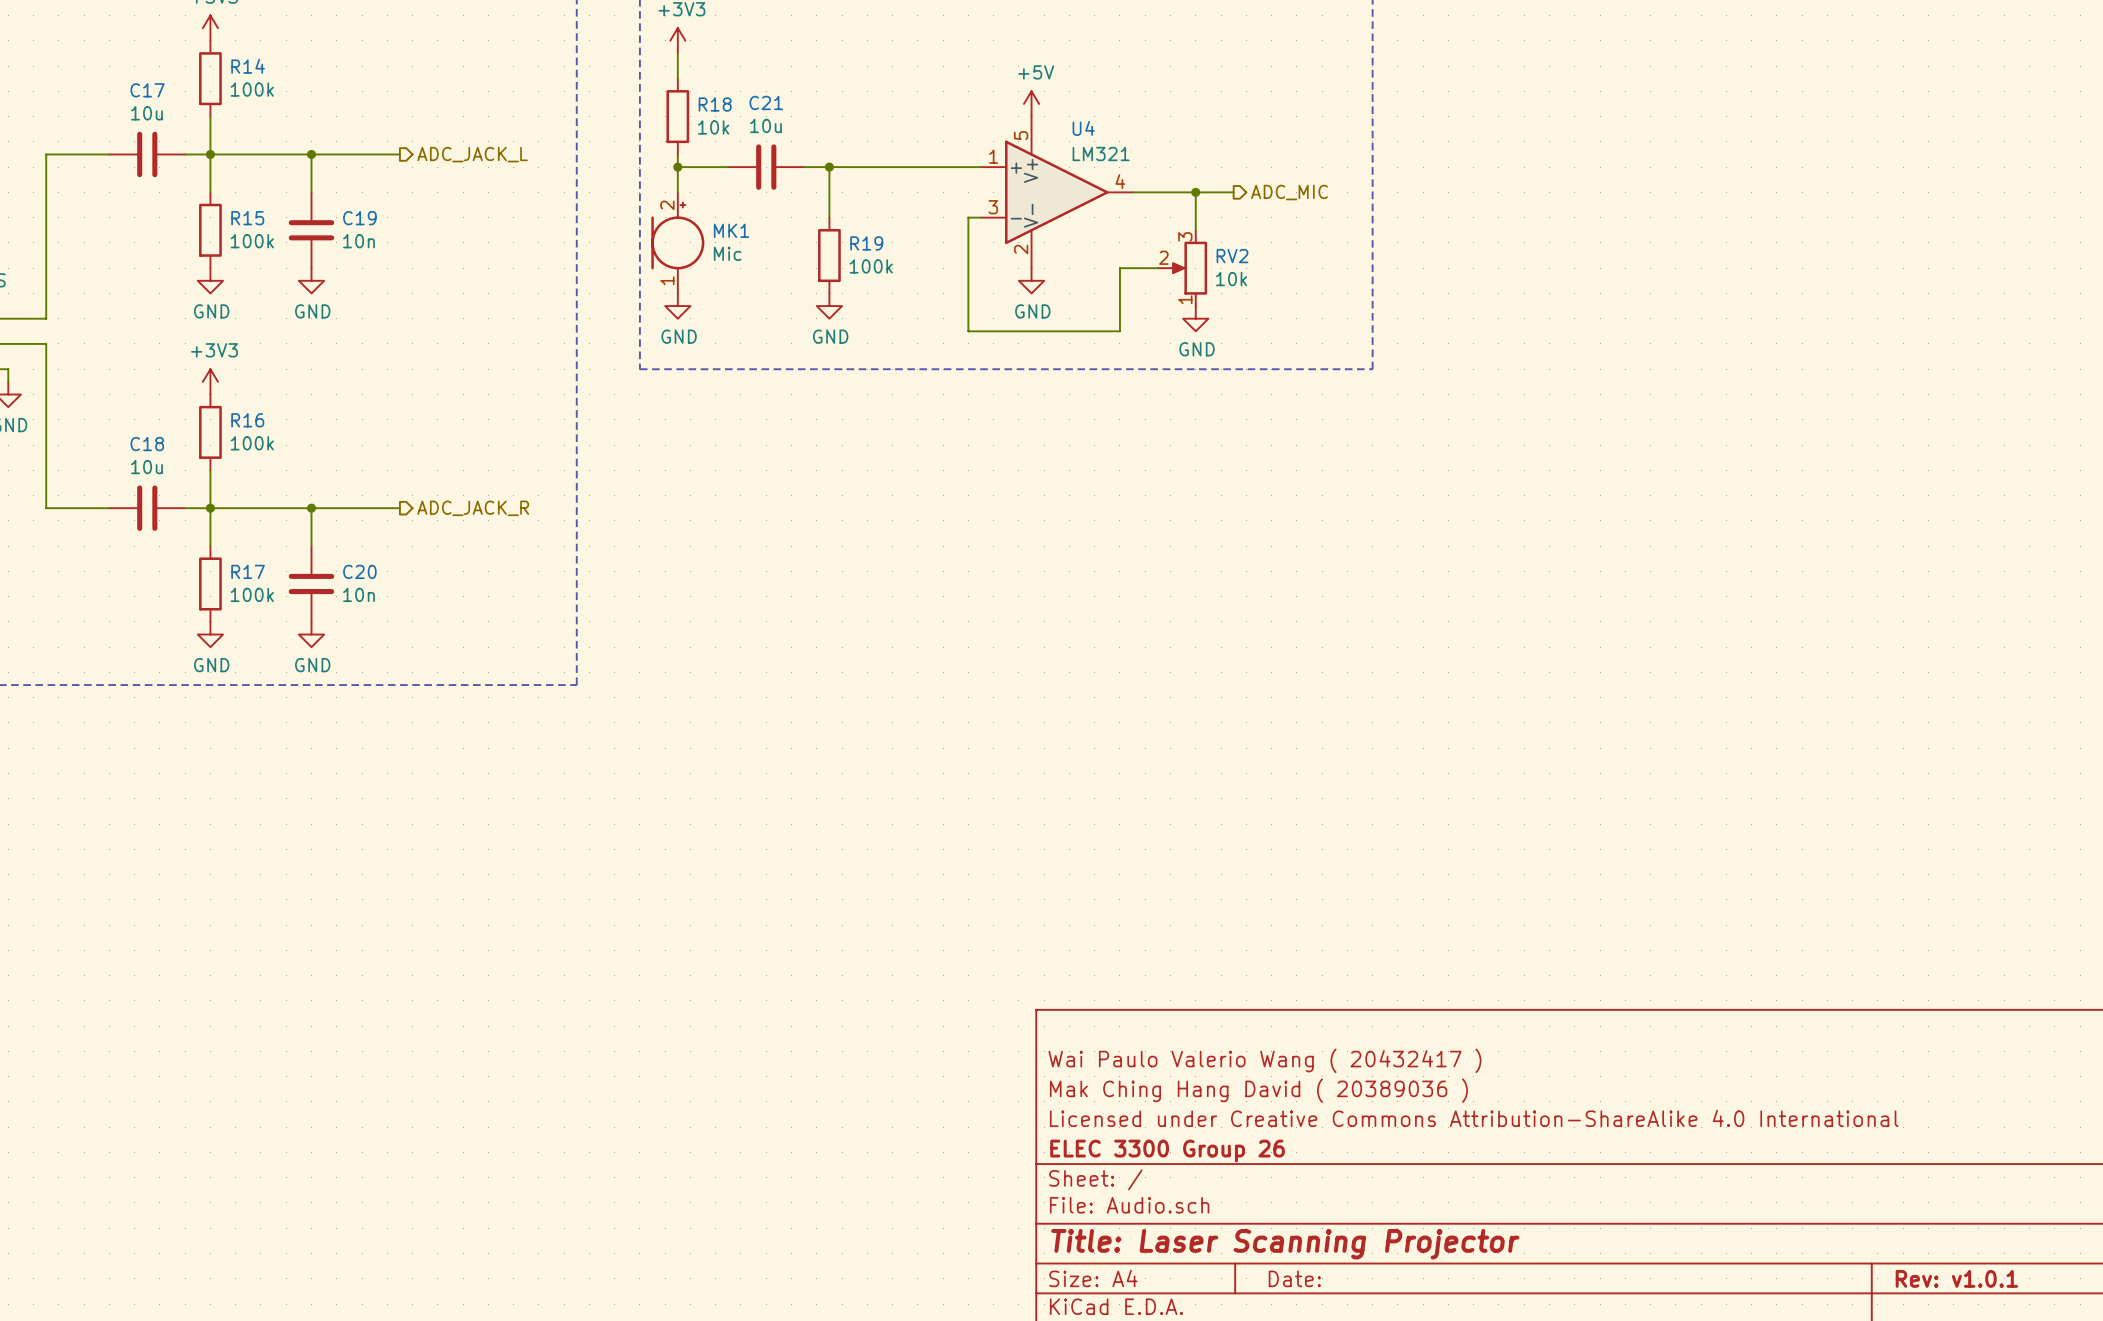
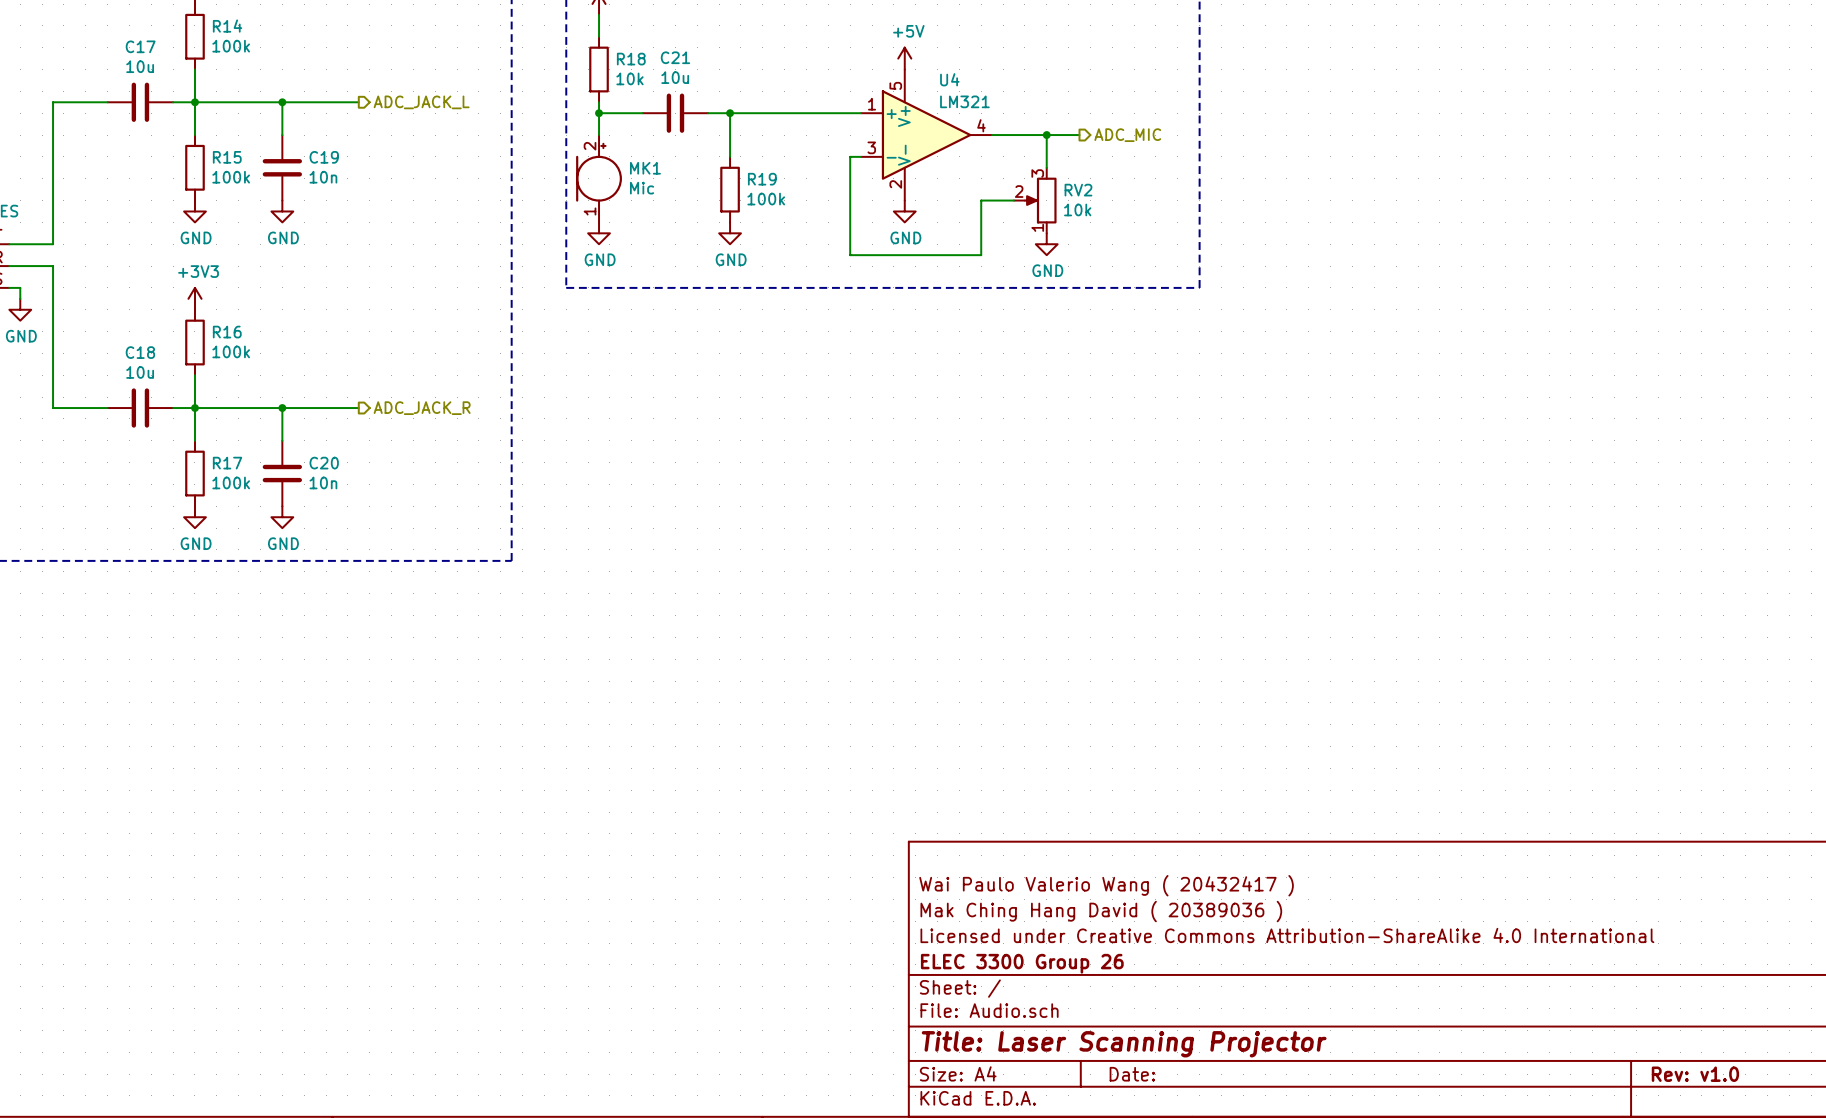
title block: Rev: v1.0.1 (1956, 1278) -> Rev: v1.0 (1695, 1074)

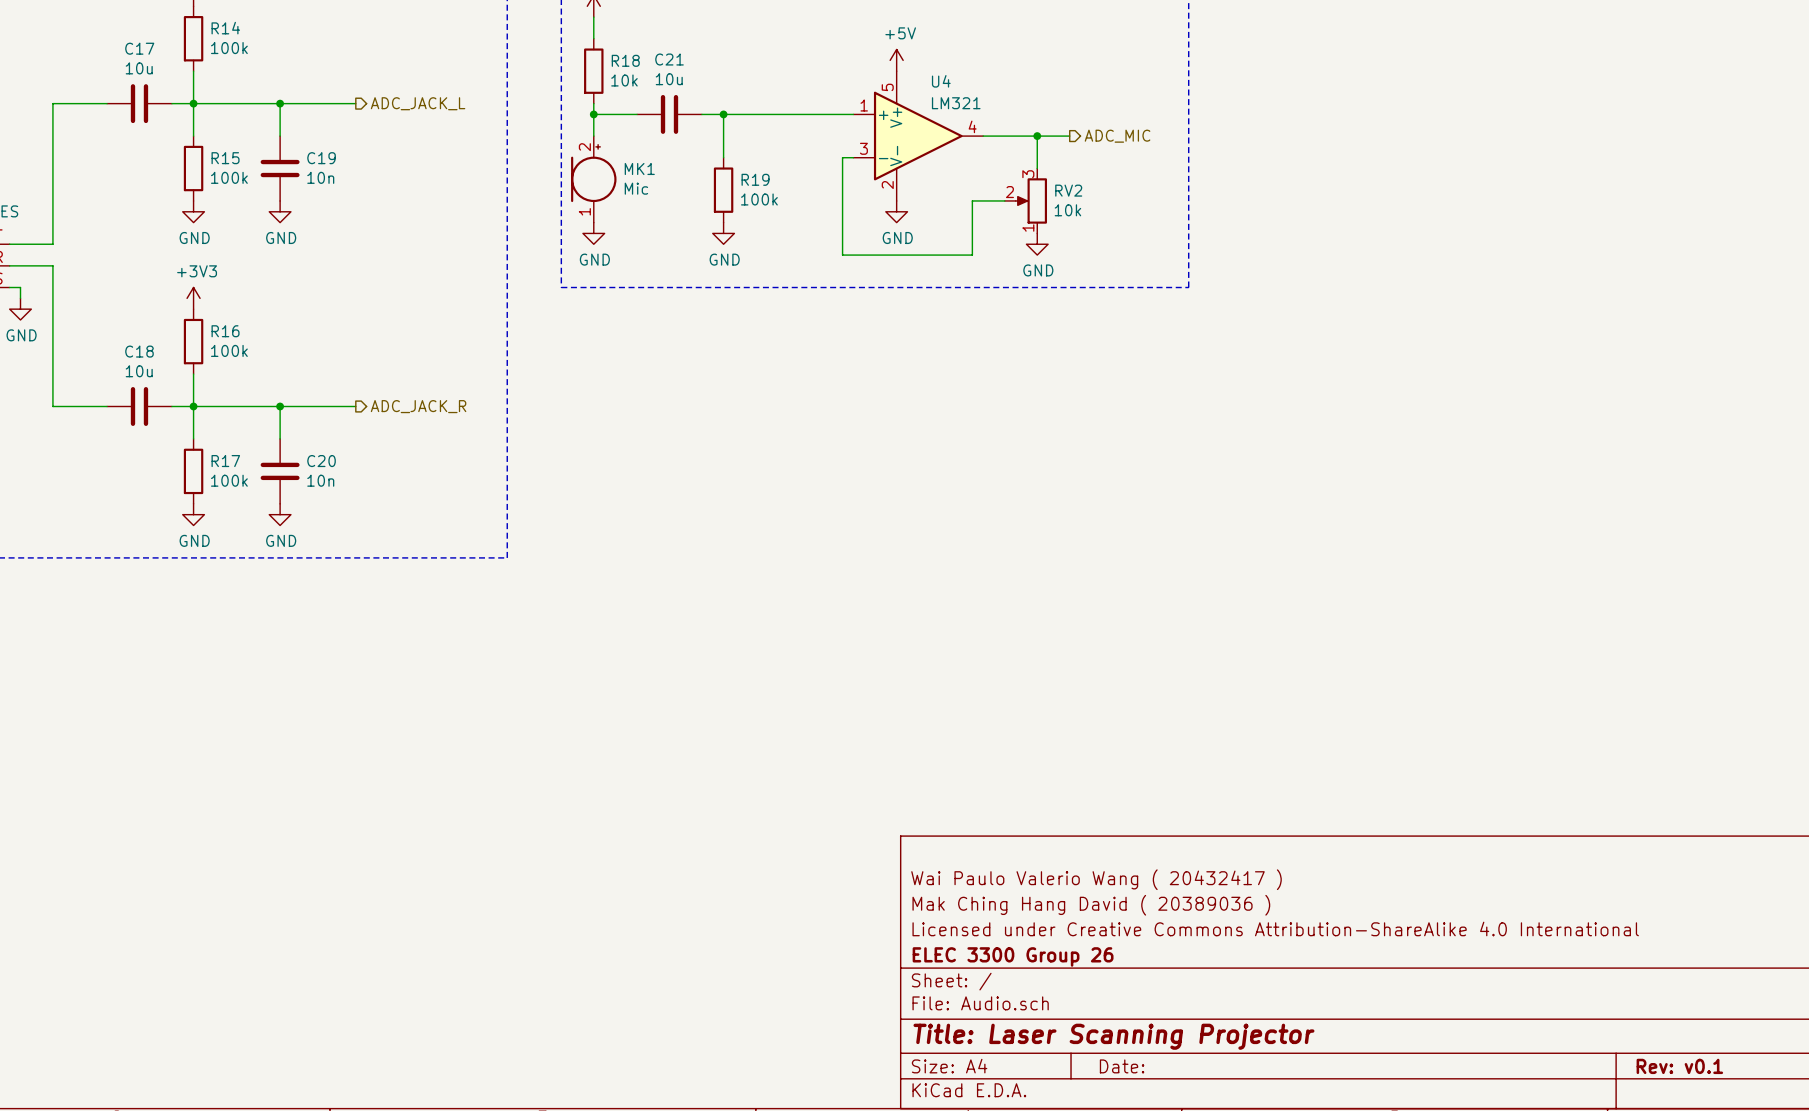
title block: Rev: v1.0 (1695, 1074) -> Rev: v0.1 (1679, 1066)

